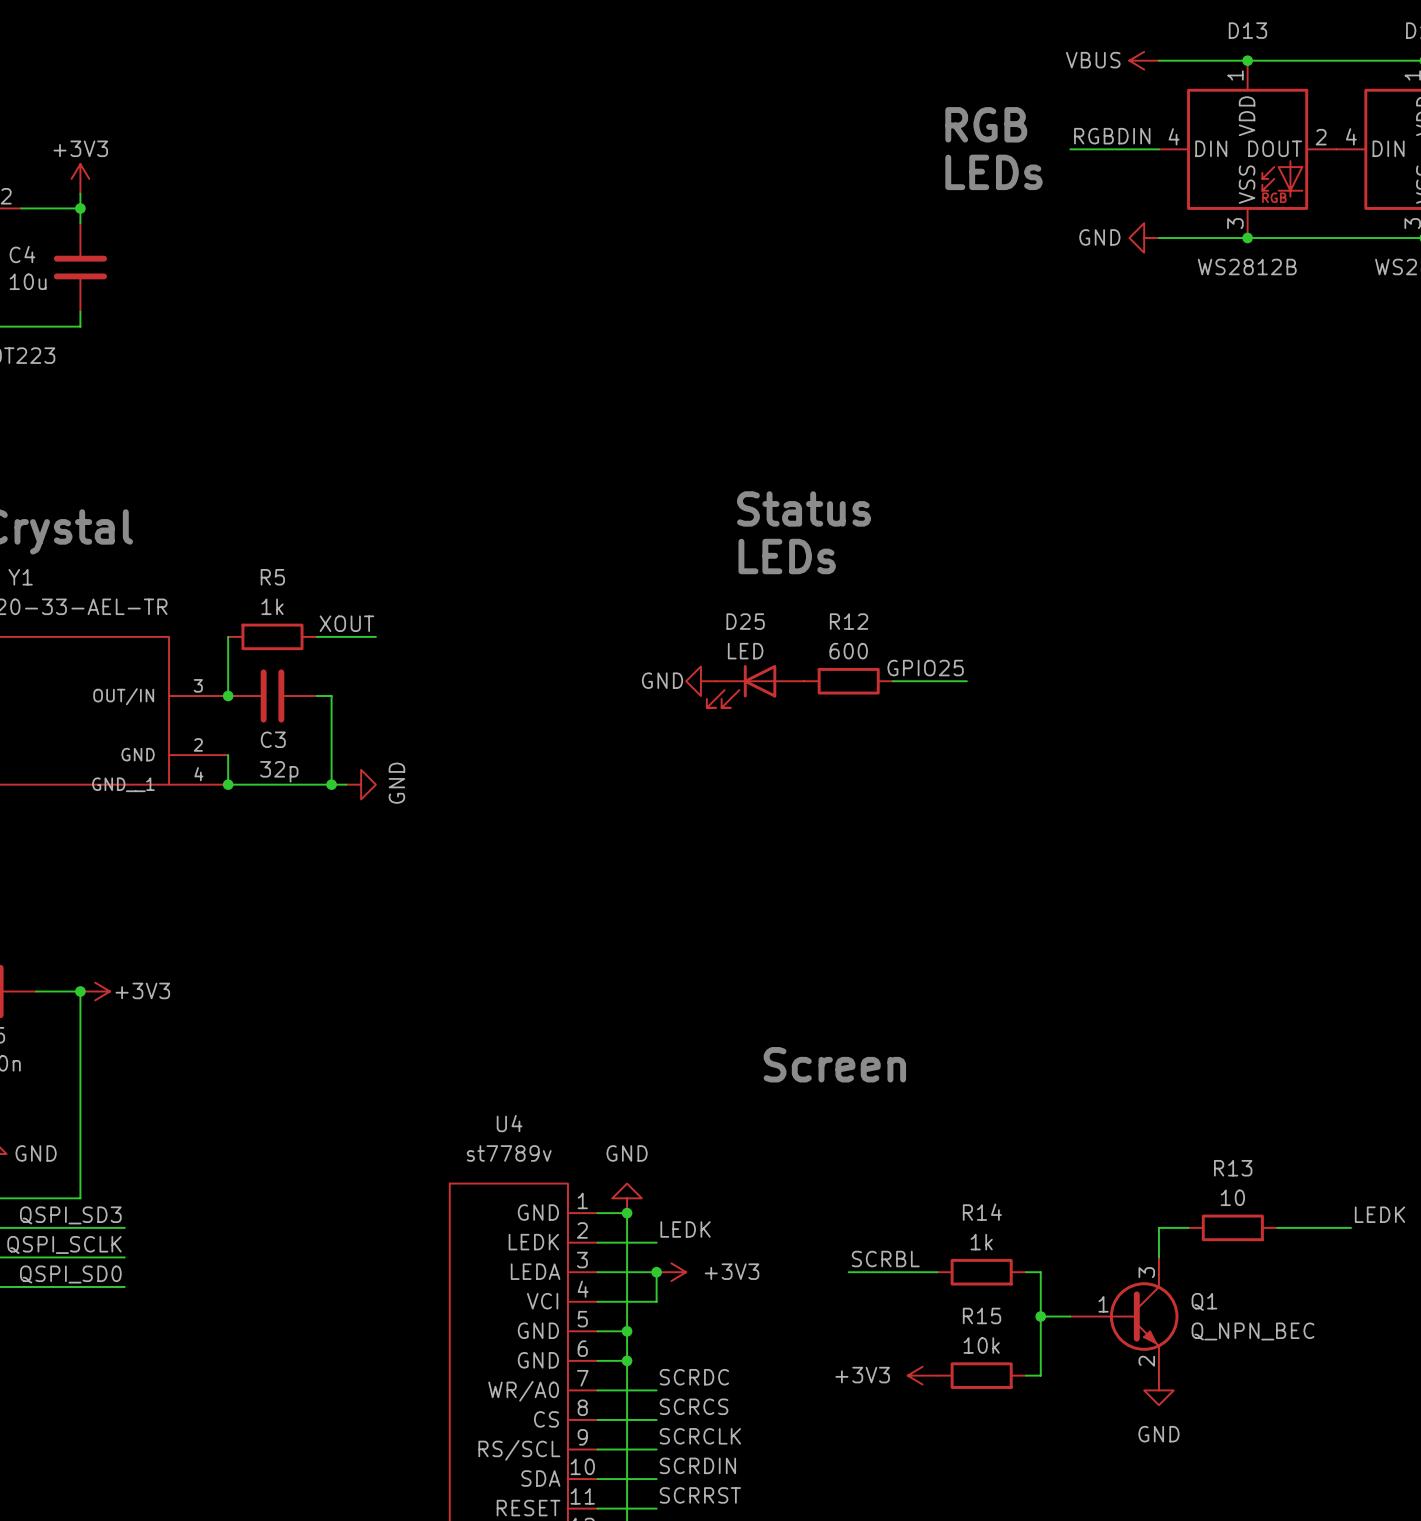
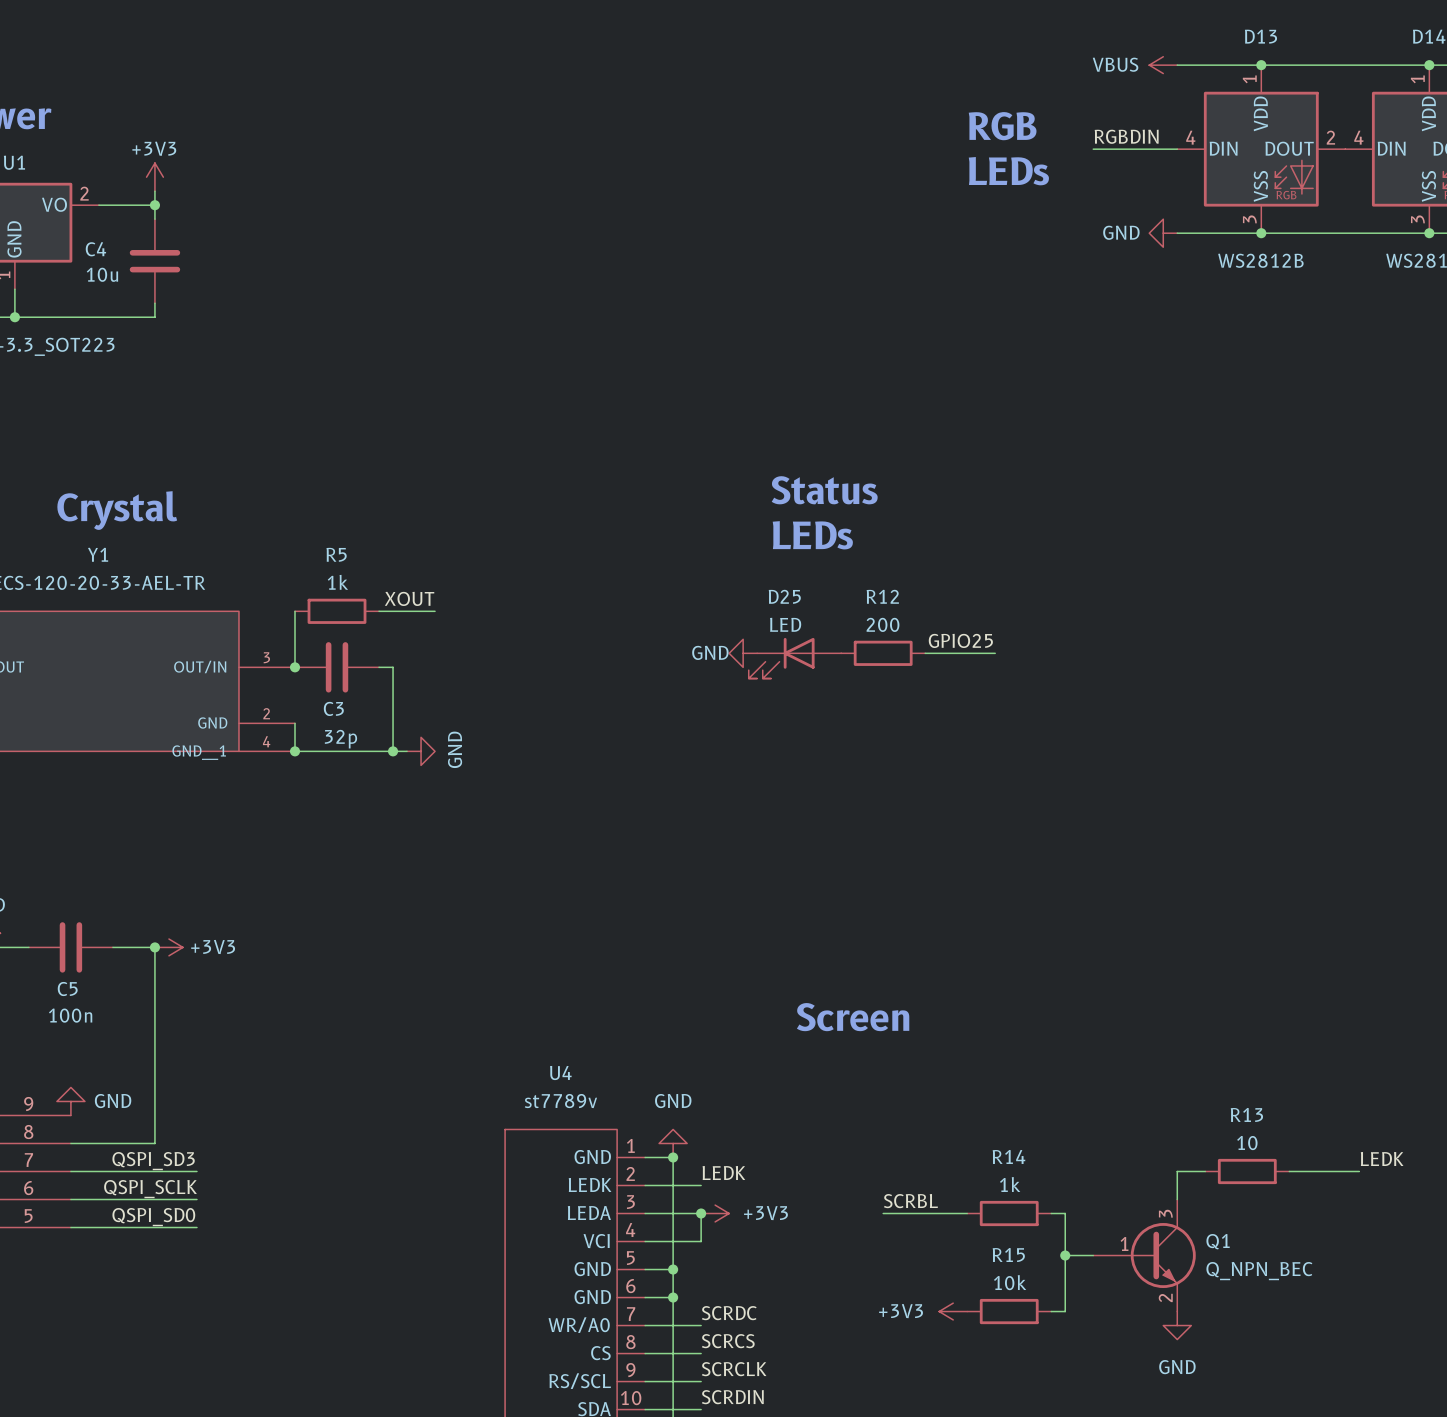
R12 value: 600 (848, 651) -> 200 (883, 624)

